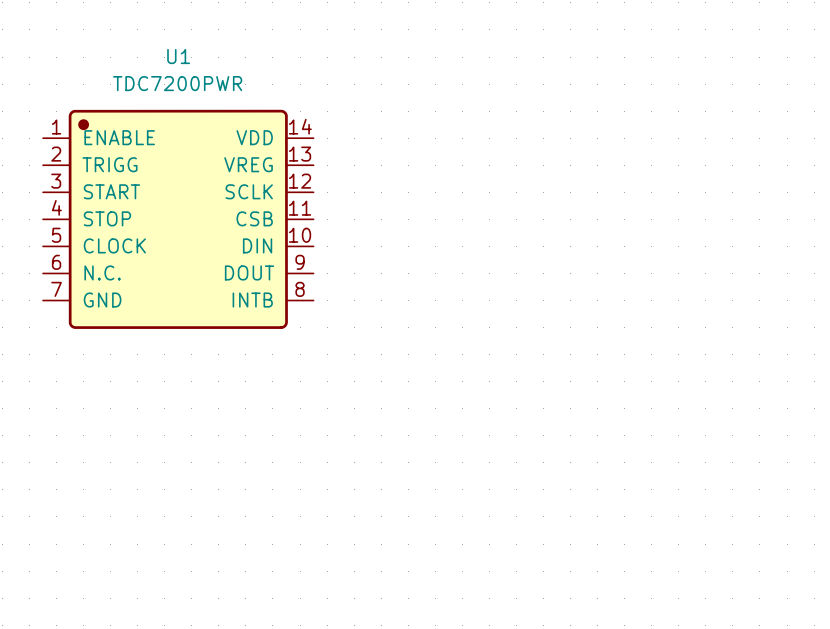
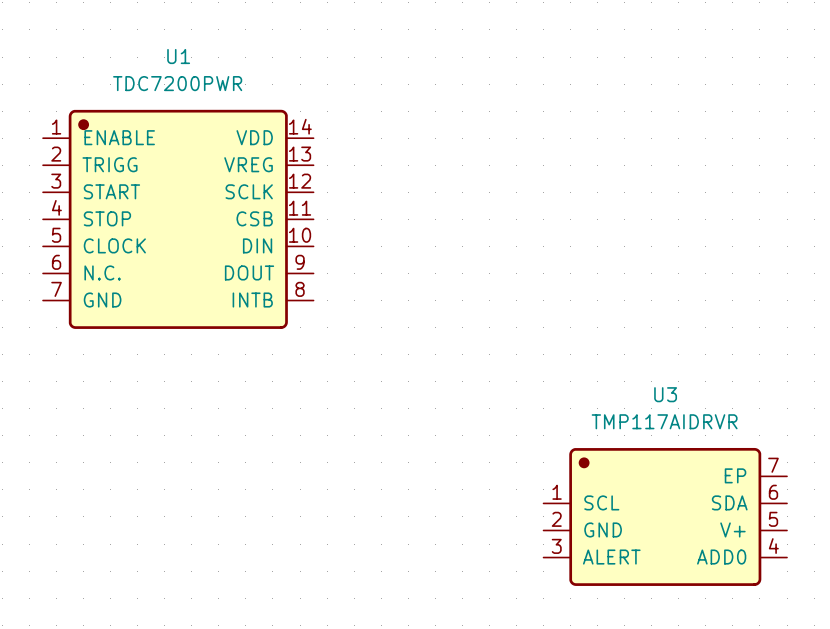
U3: none -> TMP117AIDRVR (665, 516)

